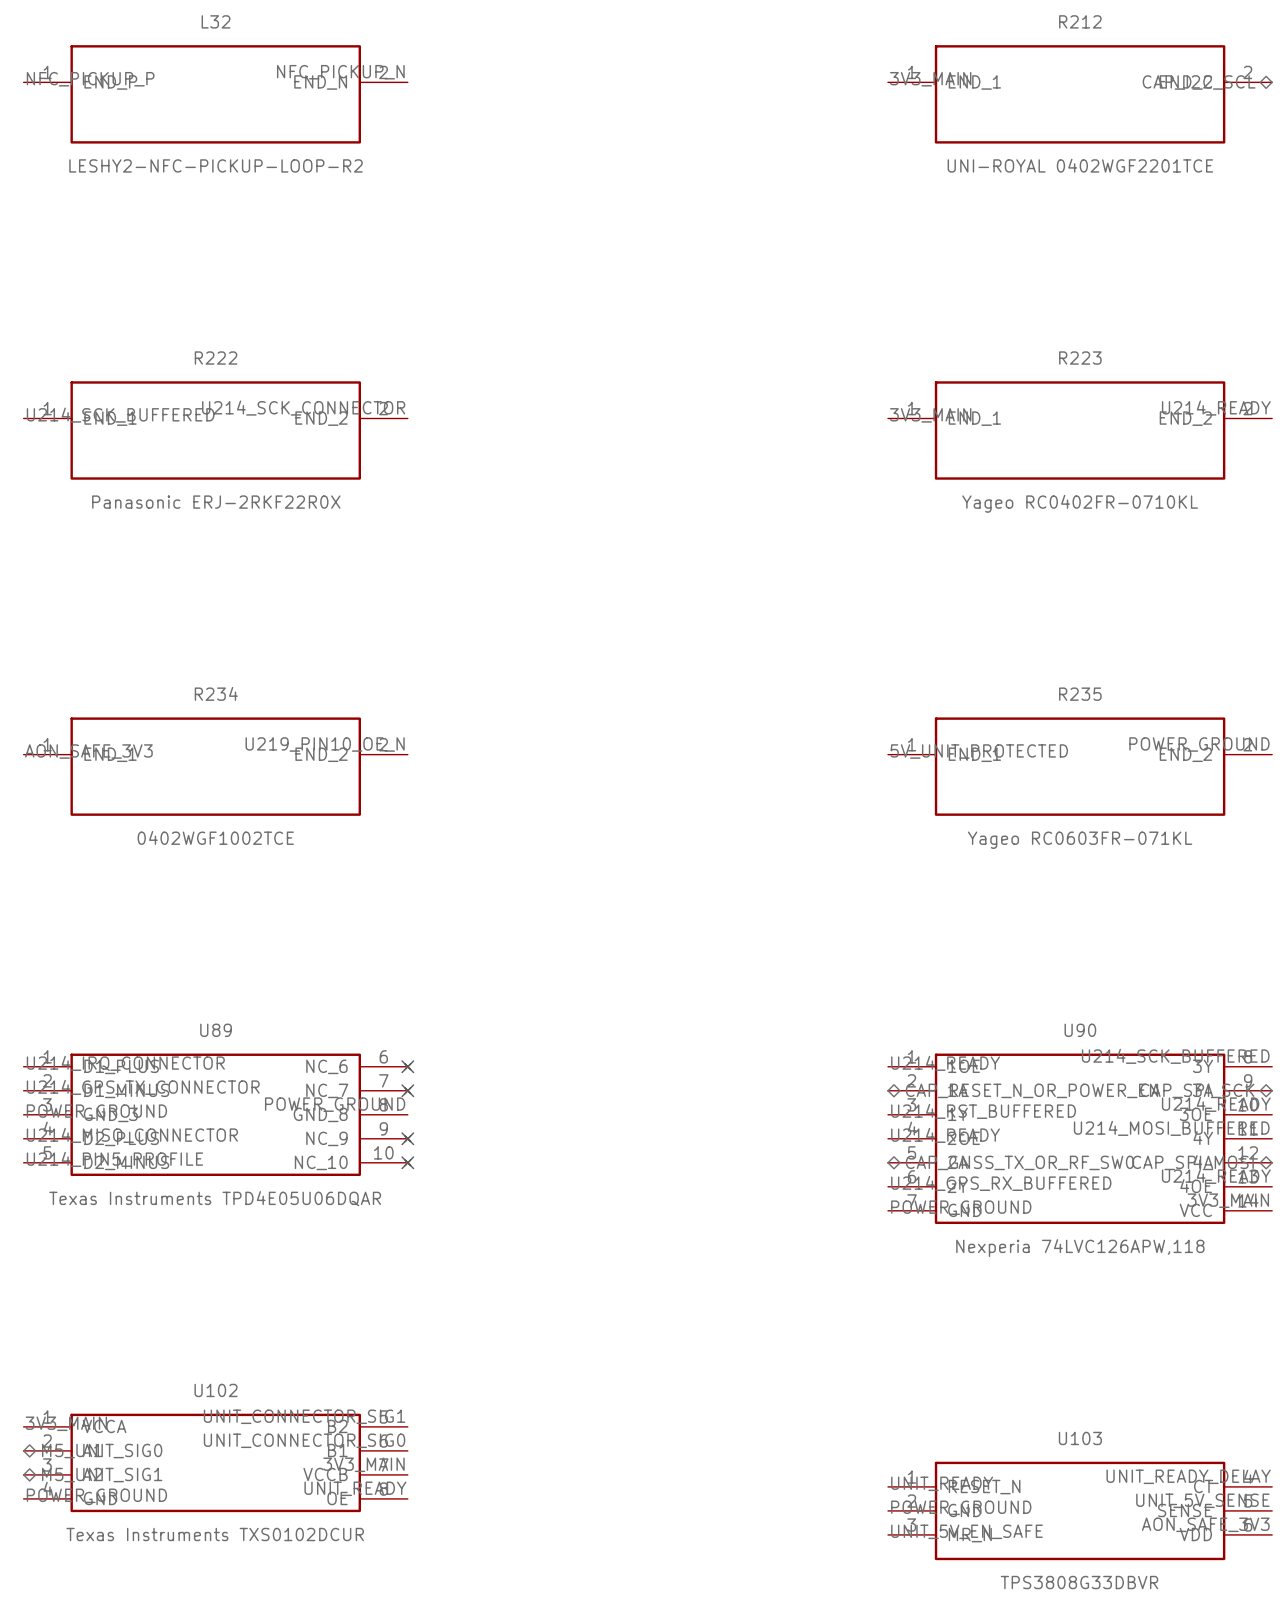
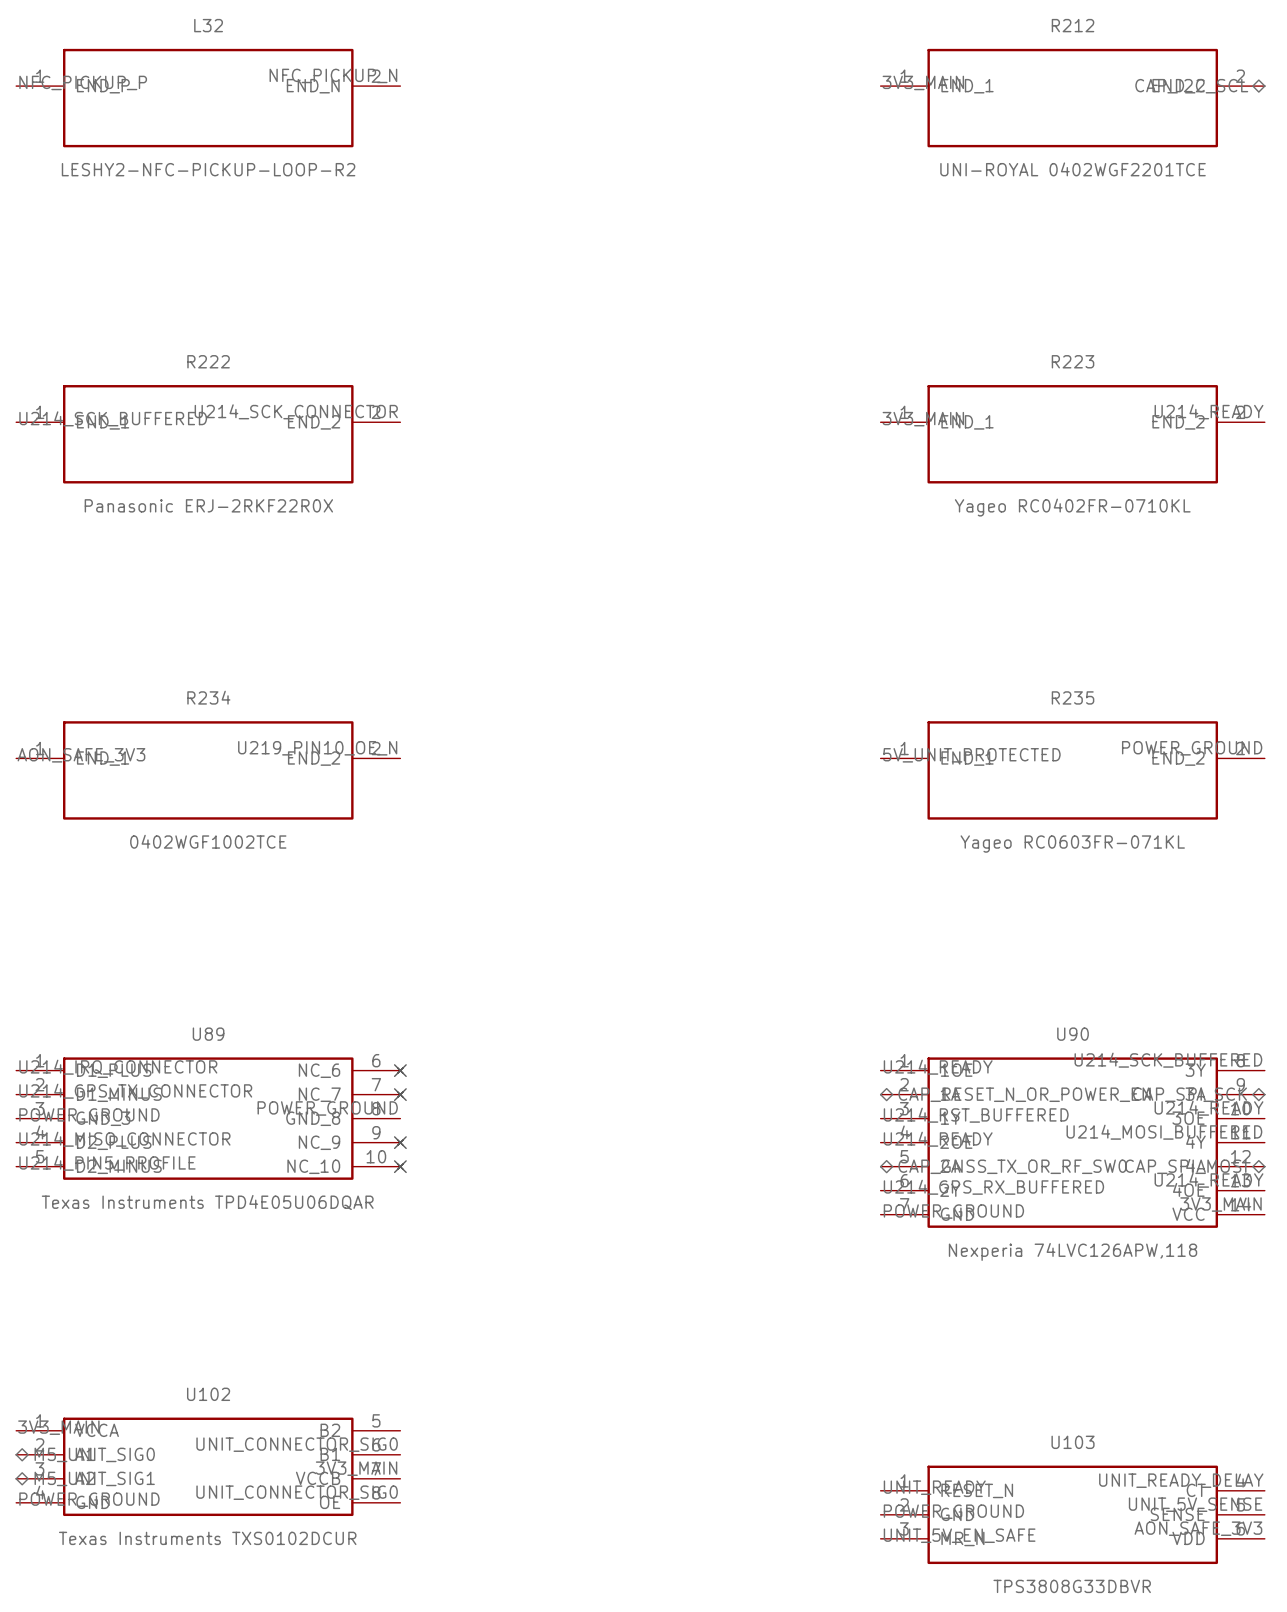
label: UNIT_CONNECTOR_SIG1 (304, 1416) -> none
label: UNIT_READY (355, 1488) -> UNIT_CONNECTOR_SIG0 (297, 1492)

